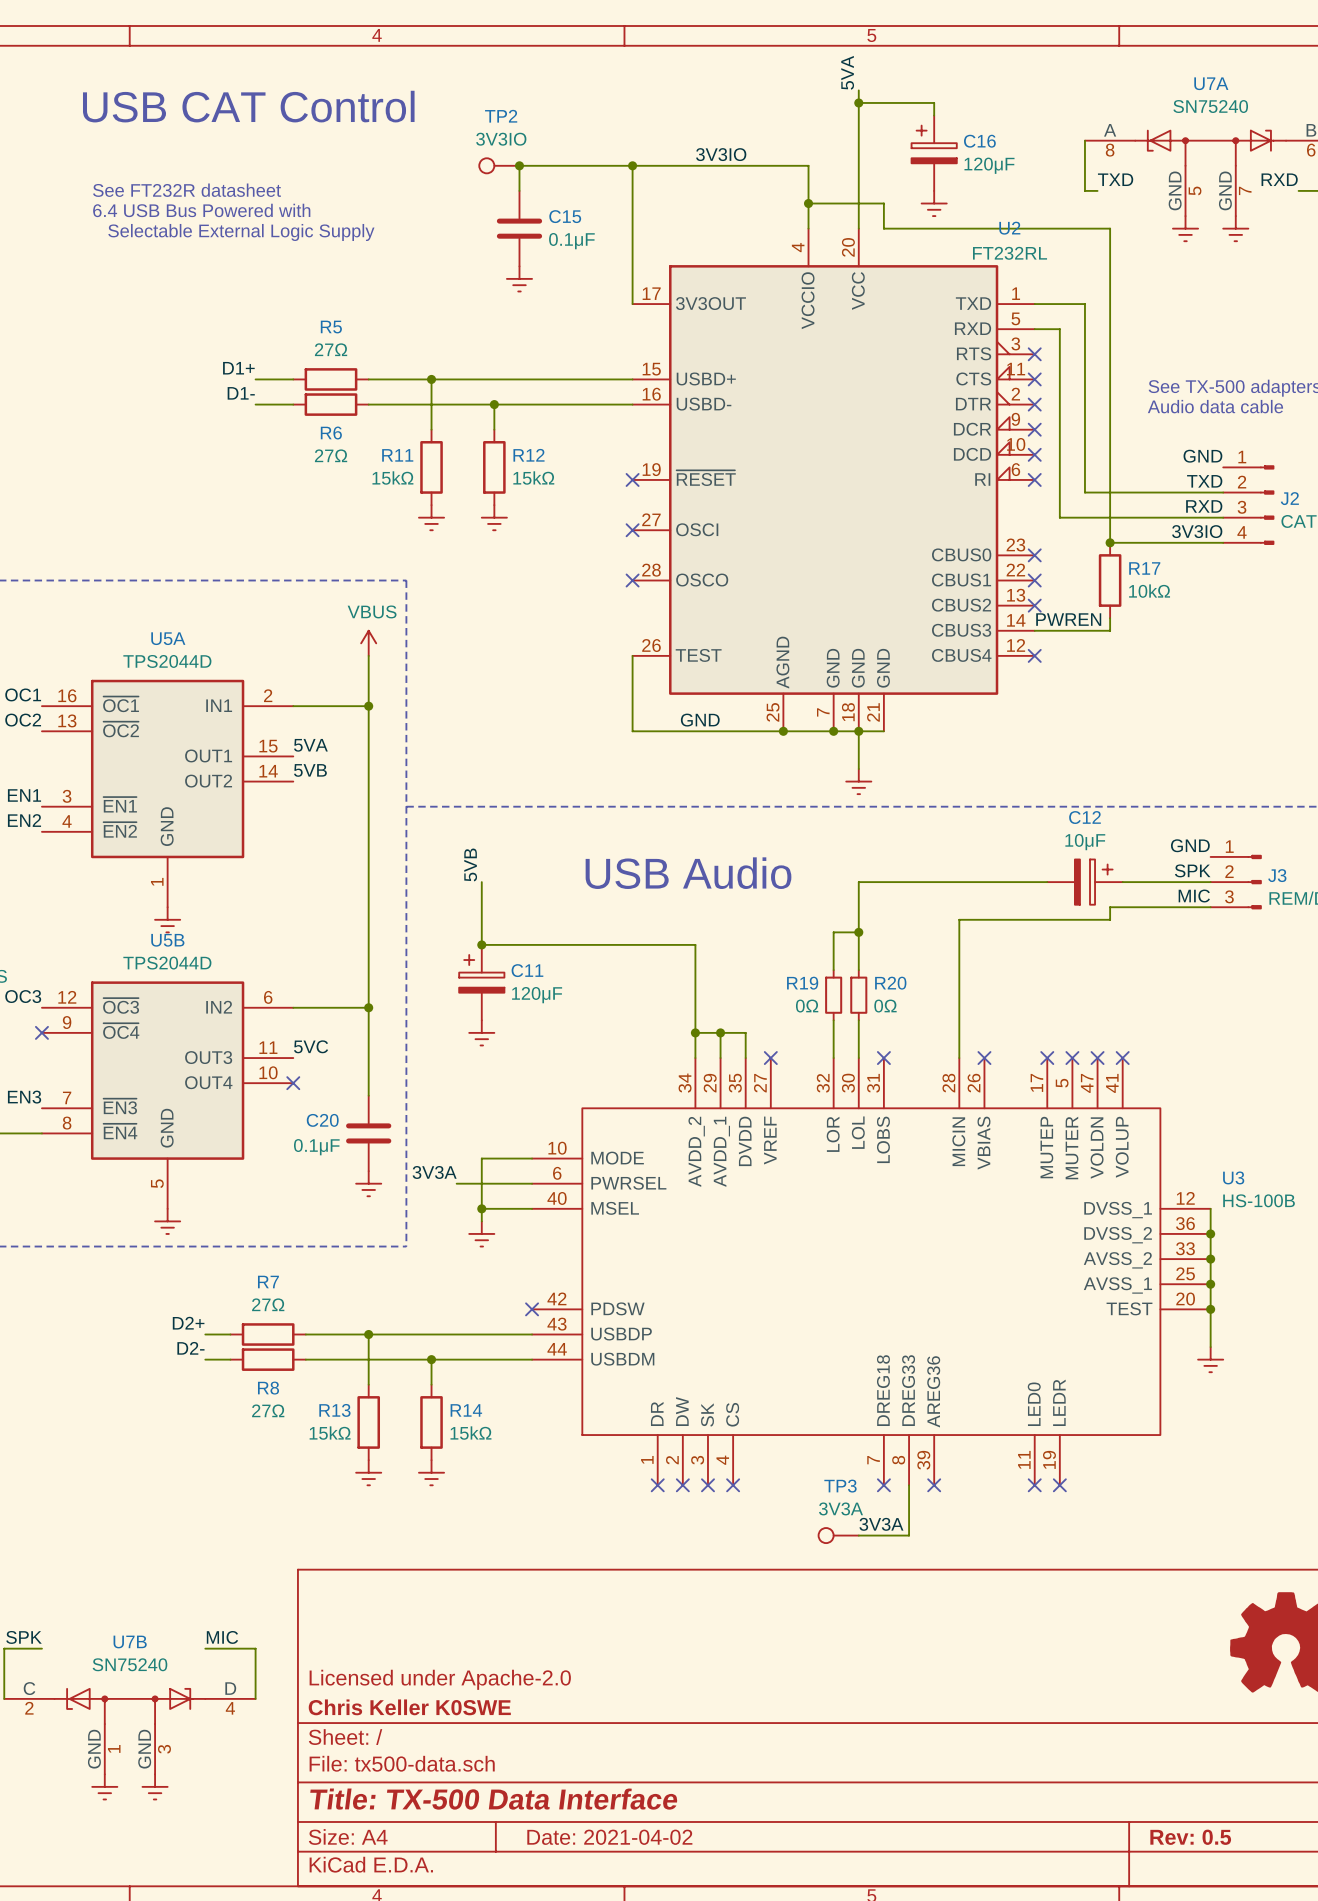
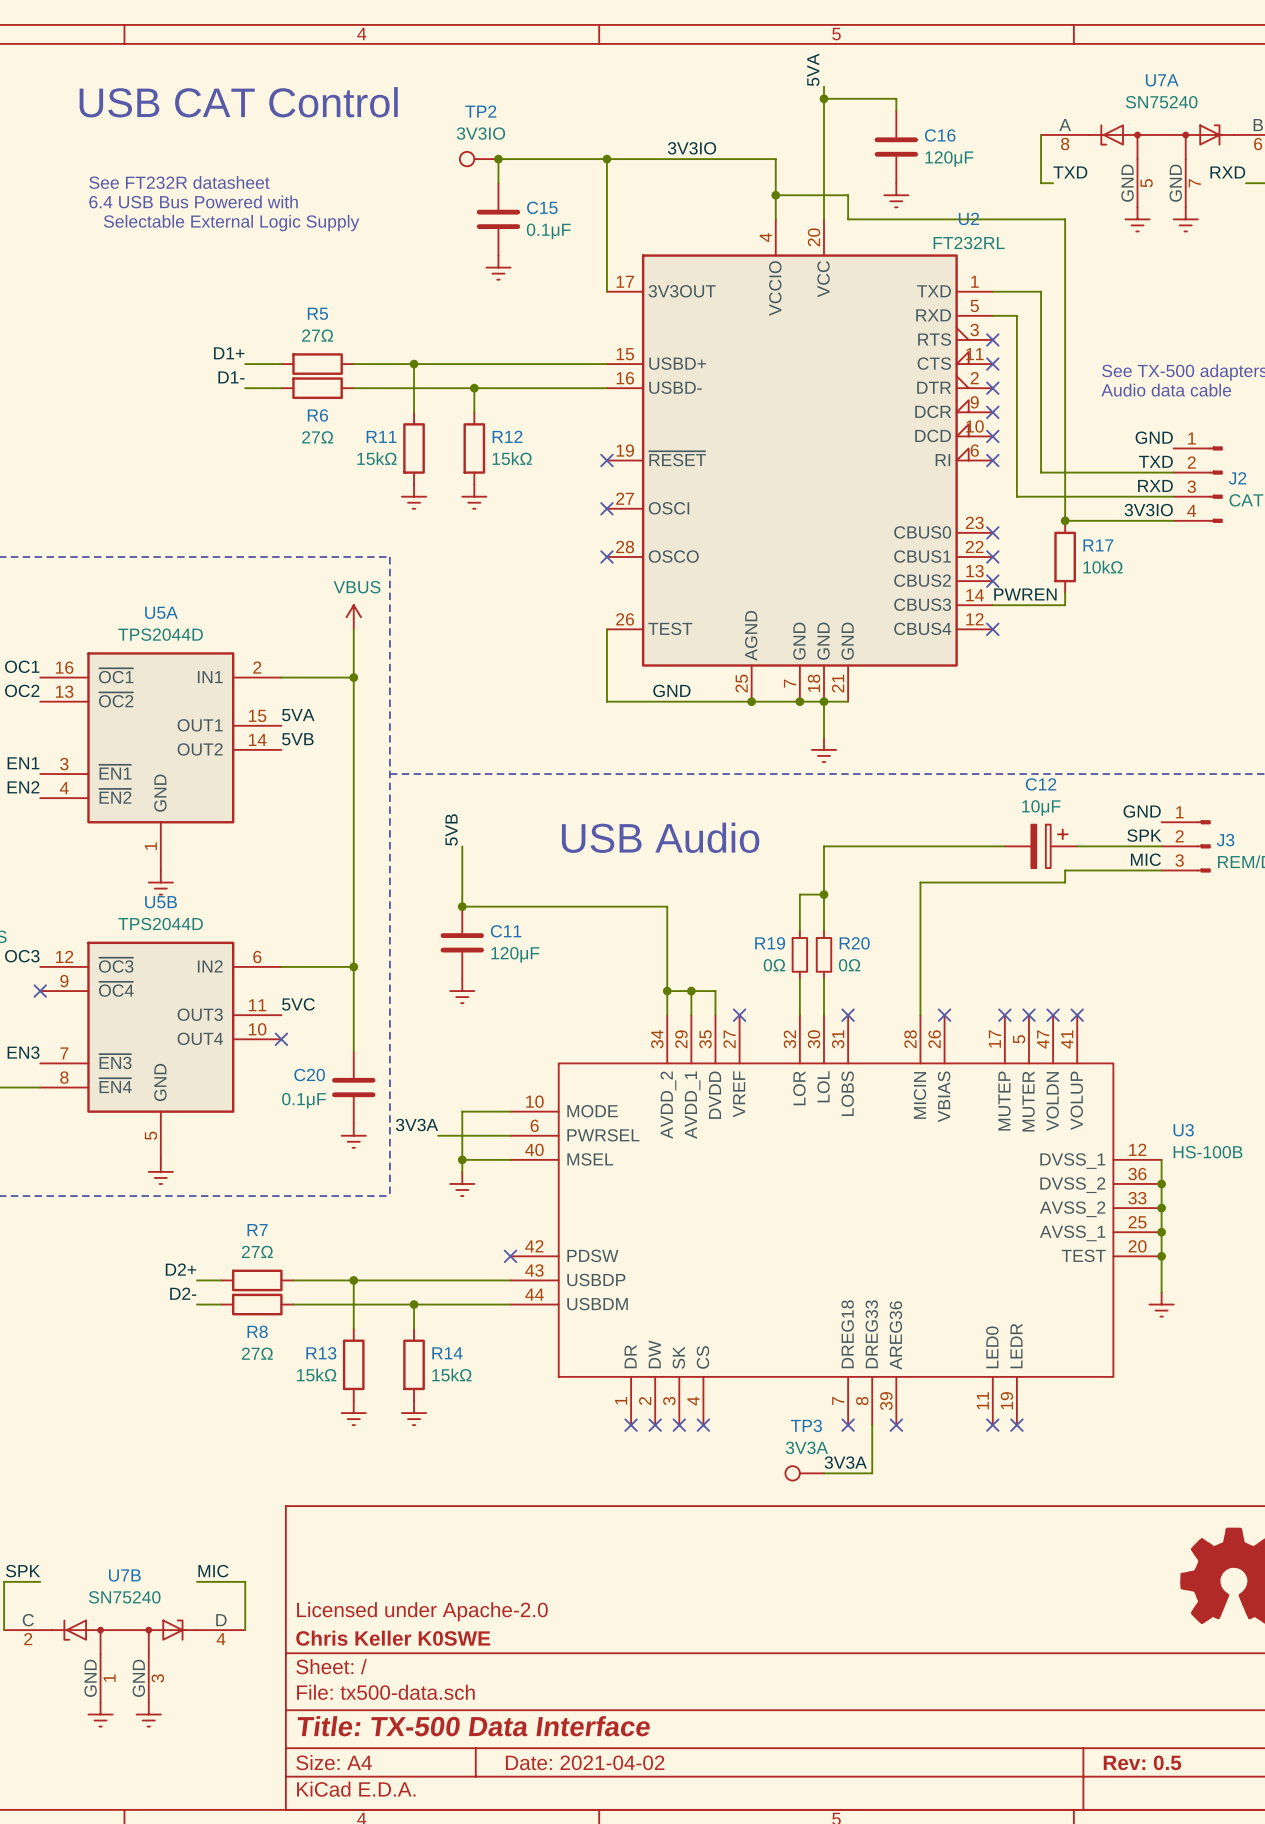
C16 symbol: [911, 115, 957, 191] -> [874, 110, 919, 184]
C11 symbol: [459, 944, 505, 1021] -> [440, 906, 484, 980]

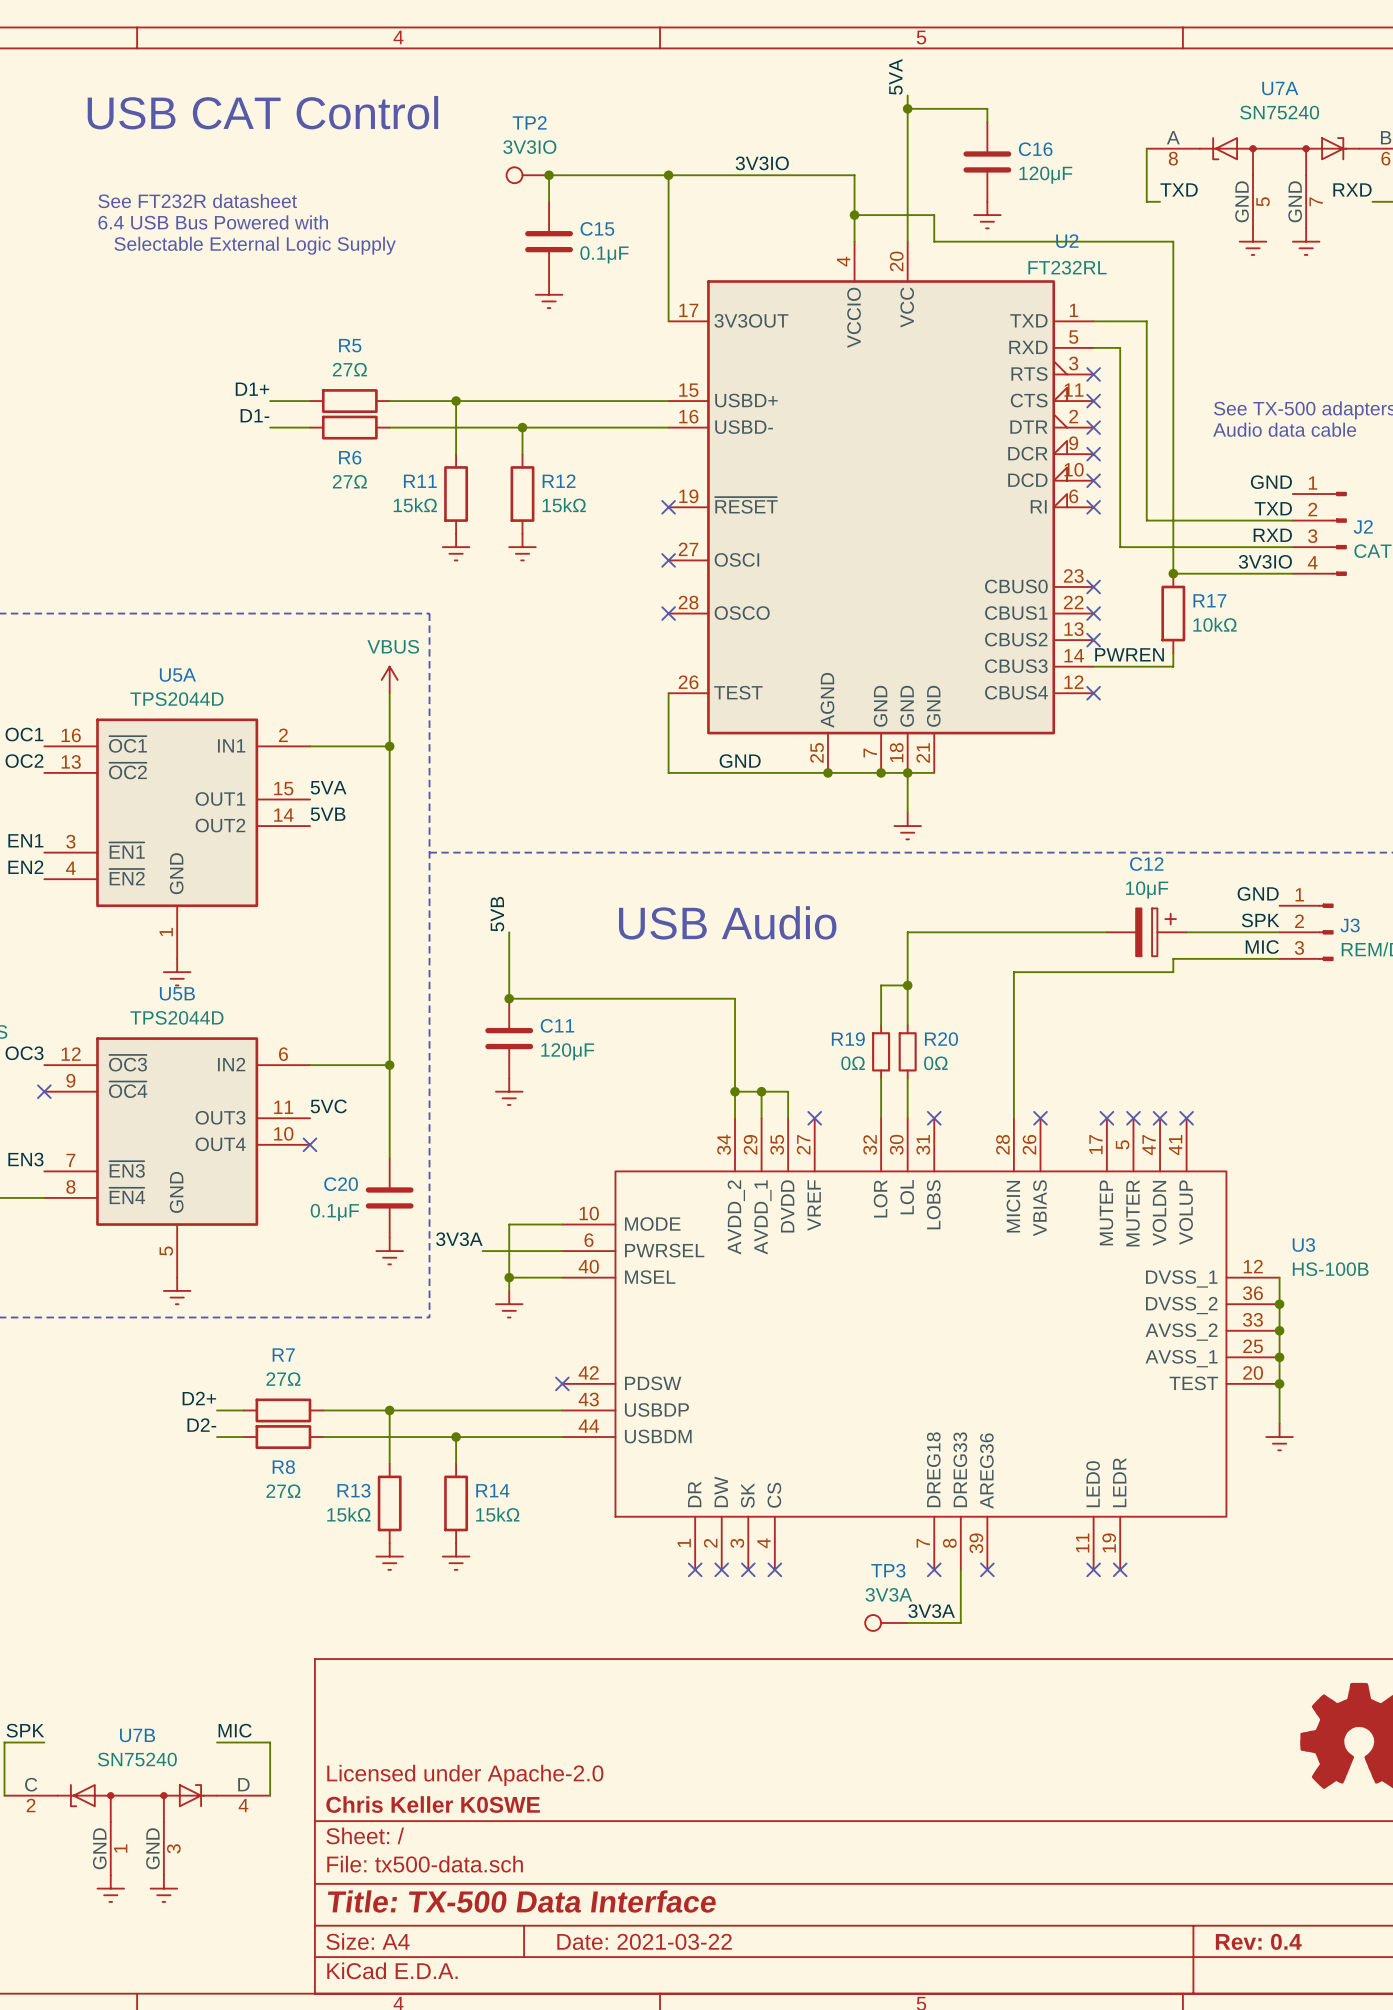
title block: Date: 2021-04-02 (585, 1762) -> Date: 2021-03-22 (644, 1941)
title block: Rev: 0.5 (1142, 1762) -> Rev: 0.4 (1258, 1941)

